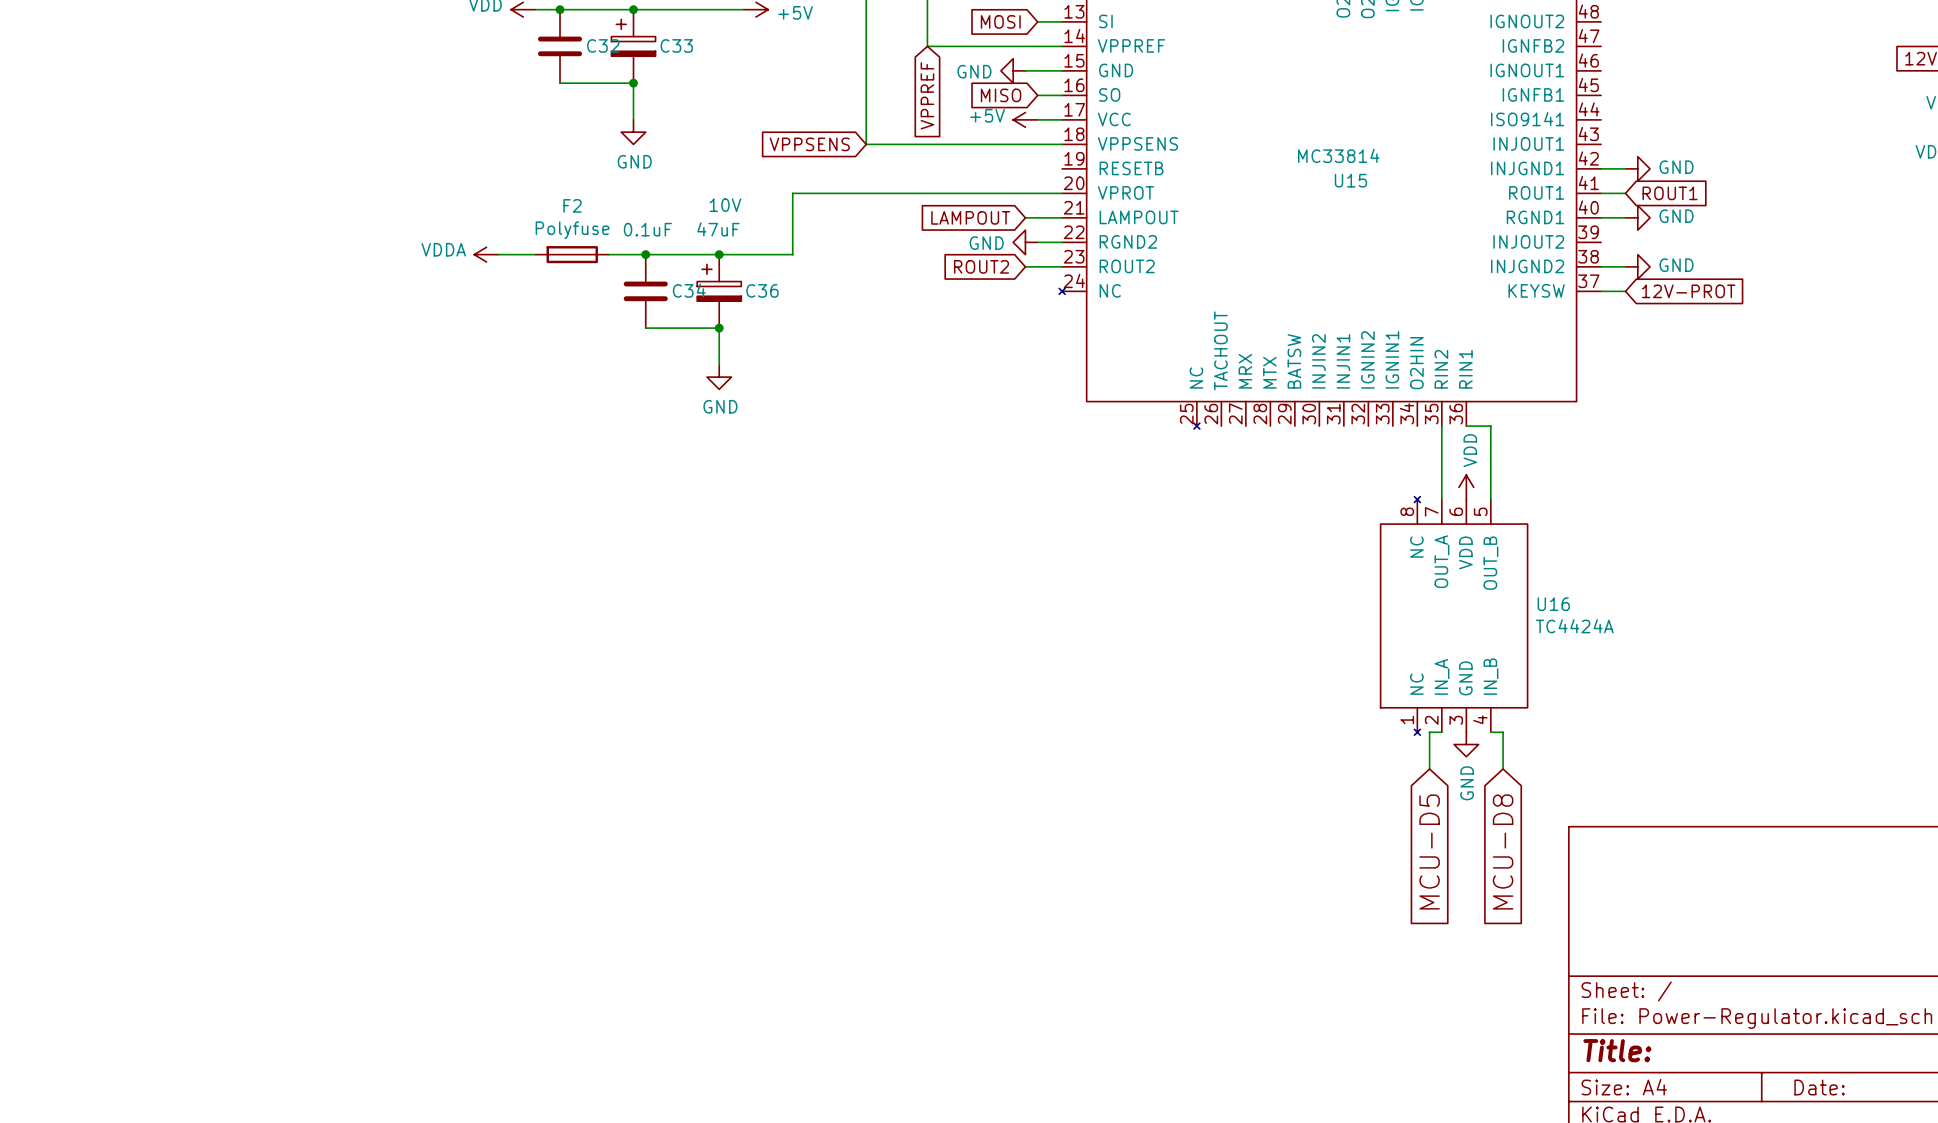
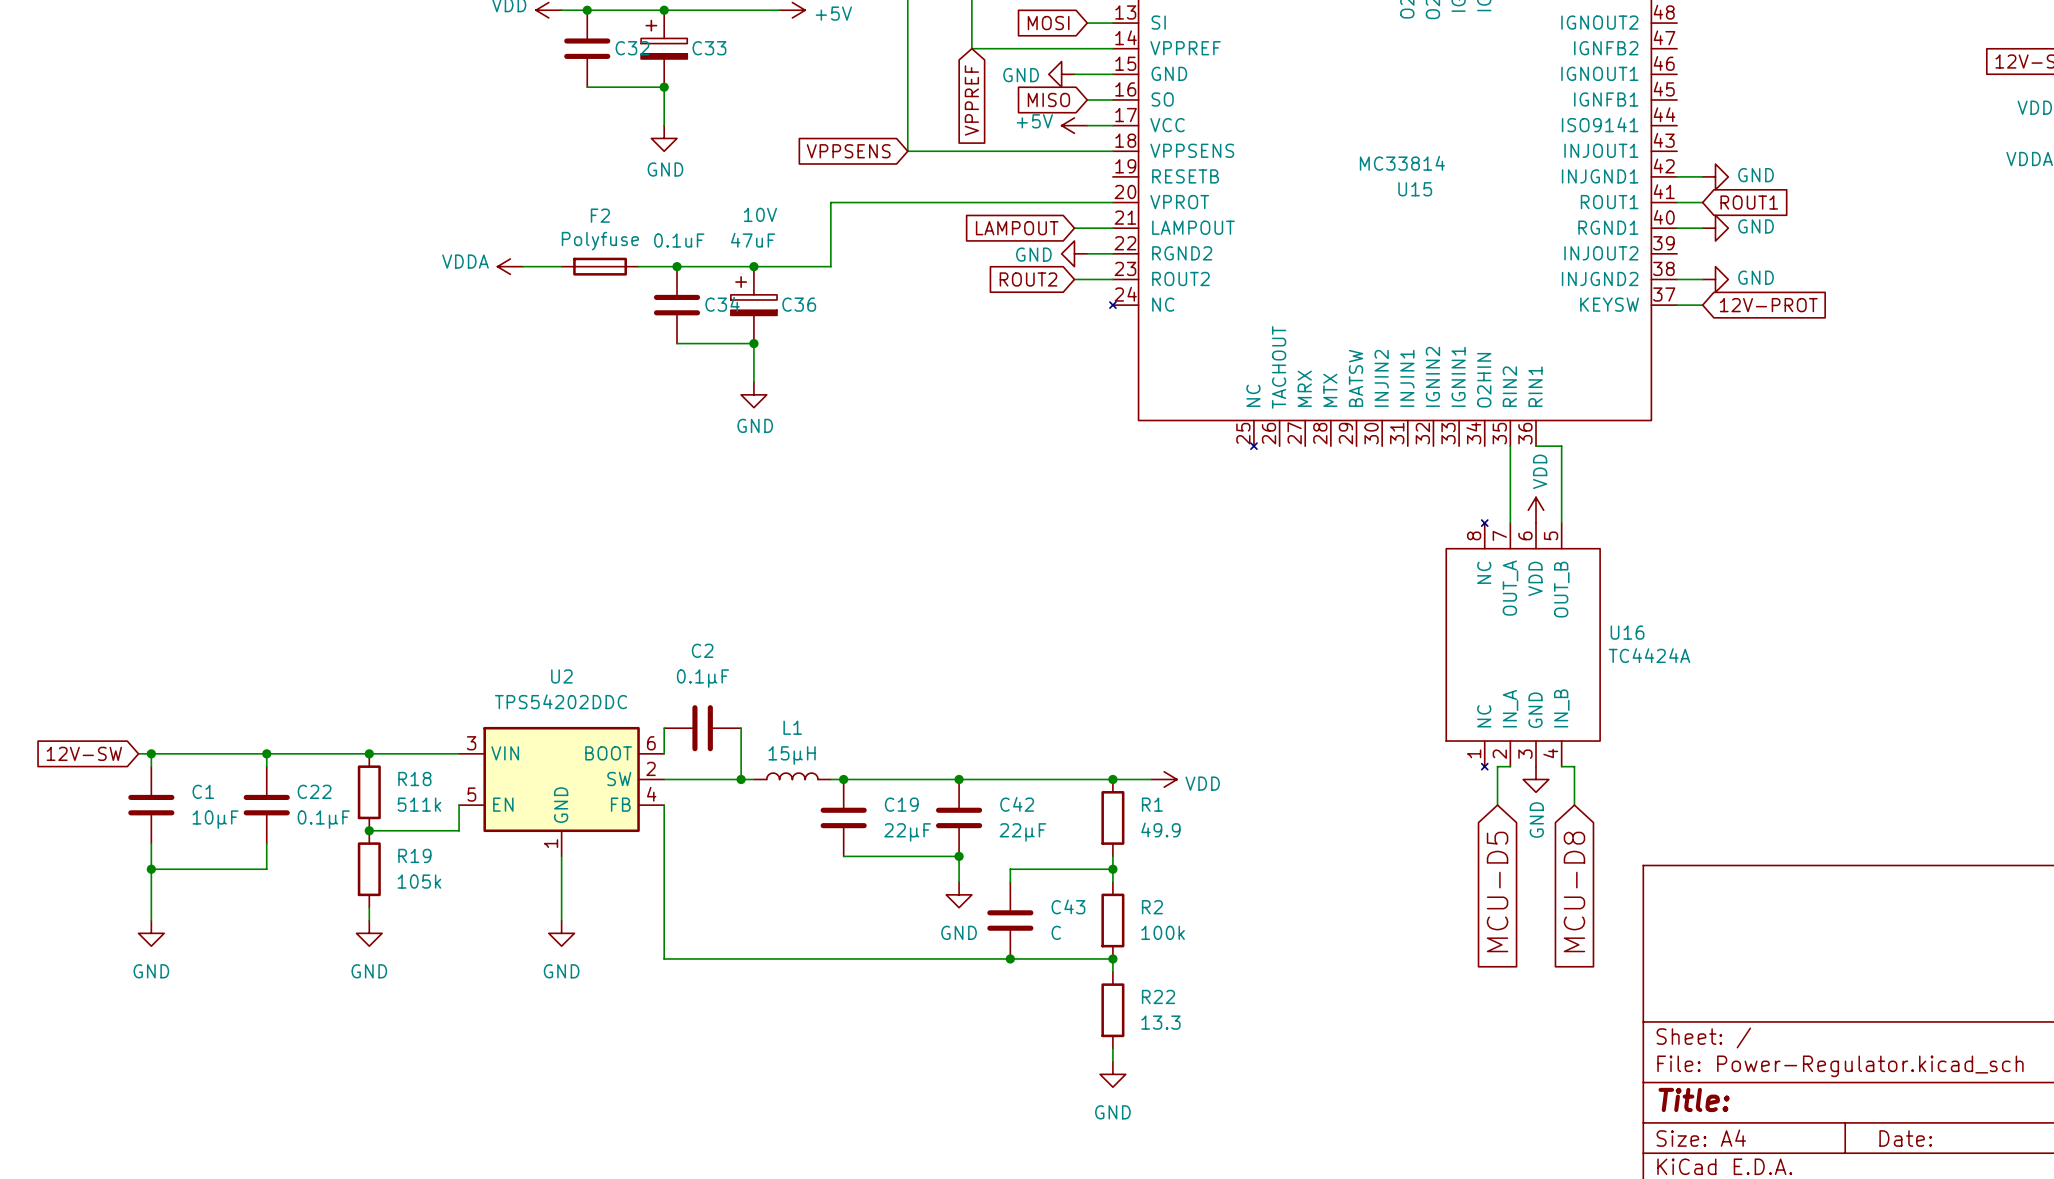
wire: none -> (664, 728) (664, 753)
C2: none -> 0.1µF (702, 728)
wire: none -> (741, 728) (741, 779)
global label: none -> 12V-SW (84, 753)
wire: none -> (138, 753) (459, 753)
wire: none -> (151, 753) (151, 766)
junction: none -> (151, 753)
wire: none -> (266, 753) (266, 766)
junction: none -> (266, 753)
junction: none -> (369, 753)
L1: none -> 15µH (792, 776)
wire: none -> (664, 779) (753, 779)
junction: none -> (741, 779)
wire: none -> (830, 779) (1151, 779)
junction: none -> (843, 779)
junction: none -> (959, 779)
junction: none -> (1112, 779)
power symbol: none -> VDD (1164, 779)
R18: none -> 511k (369, 792)
U2: none -> TPS54202DDC (561, 791)
C1: none -> 10µF (151, 805)
C22: none -> 0.1µF (266, 805)
wire: none -> (459, 805) (459, 830) (369, 830)
wire: none -> (664, 805) (664, 958) (1112, 958) (1112, 971)
C19: none -> 22µF (843, 817)
C42: none -> 22µF (959, 817)
R1: none -> 49.9 (1112, 817)
junction: none -> (369, 830)
wire: none -> (151, 843) (151, 920)
wire: none -> (266, 843) (266, 869) (151, 869)
wire: none -> (561, 856) (561, 920)
wire: none -> (843, 856) (959, 856) (959, 882)
junction: none -> (959, 856)
wire: none -> (1112, 856) (1112, 882)
junction: none -> (151, 869)
R19: none -> 105k (369, 869)
wire: none -> (1112, 869) (1010, 869) (1010, 882)
junction: none -> (1112, 869)
power symbol: none -> GND (959, 894)
wire: none -> (369, 907) (369, 920)
C43: none -> C (1010, 920)
R2: none -> 100k (1112, 920)
power symbol: none -> GND (151, 933)
power symbol: none -> GND (369, 933)
power symbol: none -> GND (561, 933)
junction: none -> (1010, 958)
junction: none -> (1112, 958)
R22: none -> 13.3 (1112, 1010)
wire: none -> (1112, 1048) (1112, 1061)
power symbol: none -> GND (1112, 1074)

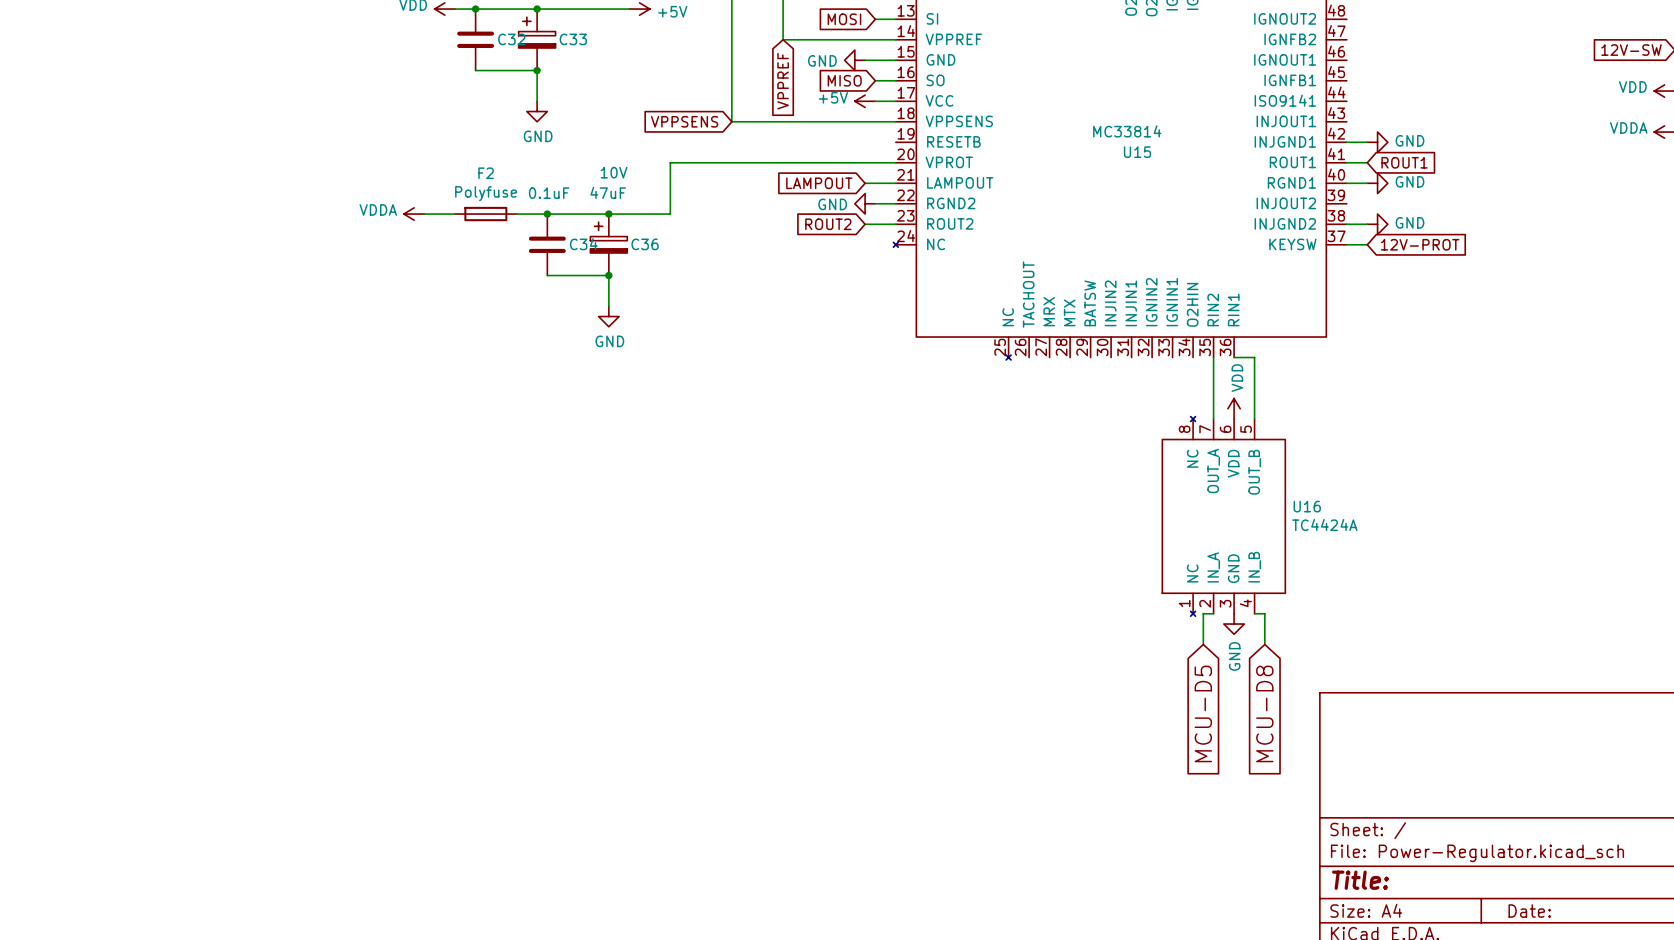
wire: (664, 728) (664, 753) -> none
C2: 0.1µF (702, 728) -> none
wire: (741, 728) (741, 779) -> none
global label: 12V-SW (84, 753) -> none
wire: (138, 753) (459, 753) -> none
wire: (151, 753) (151, 766) -> none
junction: (151, 753) -> none
wire: (266, 753) (266, 766) -> none
junction: (266, 753) -> none
junction: (369, 753) -> none
L1: 15µH (792, 776) -> none
wire: (664, 779) (753, 779) -> none
junction: (741, 779) -> none
wire: (830, 779) (1151, 779) -> none
junction: (843, 779) -> none
junction: (959, 779) -> none
junction: (1112, 779) -> none
power symbol: VDD (1164, 779) -> none
U2: TPS54202DDC (561, 791) -> none
R18: 511k (369, 792) -> none
C1: 10µF (151, 805) -> none
C22: 0.1µF (266, 805) -> none
wire: (459, 805) (459, 830) (369, 830) -> none
wire: (664, 805) (664, 958) (1112, 958) (1112, 971) -> none
C19: 22µF (843, 817) -> none
C42: 22µF (959, 817) -> none
R1: 49.9 (1112, 817) -> none
junction: (369, 830) -> none
wire: (151, 843) (151, 920) -> none
wire: (266, 843) (266, 869) (151, 869) -> none
wire: (561, 856) (561, 920) -> none
wire: (843, 856) (959, 856) (959, 882) -> none
junction: (959, 856) -> none
wire: (1112, 856) (1112, 882) -> none
junction: (151, 869) -> none
R19: 105k (369, 869) -> none
wire: (1112, 869) (1010, 869) (1010, 882) -> none
junction: (1112, 869) -> none
power symbol: GND (959, 894) -> none
wire: (369, 907) (369, 920) -> none
C43: C (1010, 920) -> none
R2: 100k (1112, 920) -> none
power symbol: GND (151, 933) -> none
power symbol: GND (369, 933) -> none
power symbol: GND (561, 933) -> none
junction: (1010, 958) -> none
junction: (1112, 958) -> none
R22: 13.3 (1112, 1010) -> none
wire: (1112, 1048) (1112, 1061) -> none
power symbol: GND (1112, 1074) -> none

